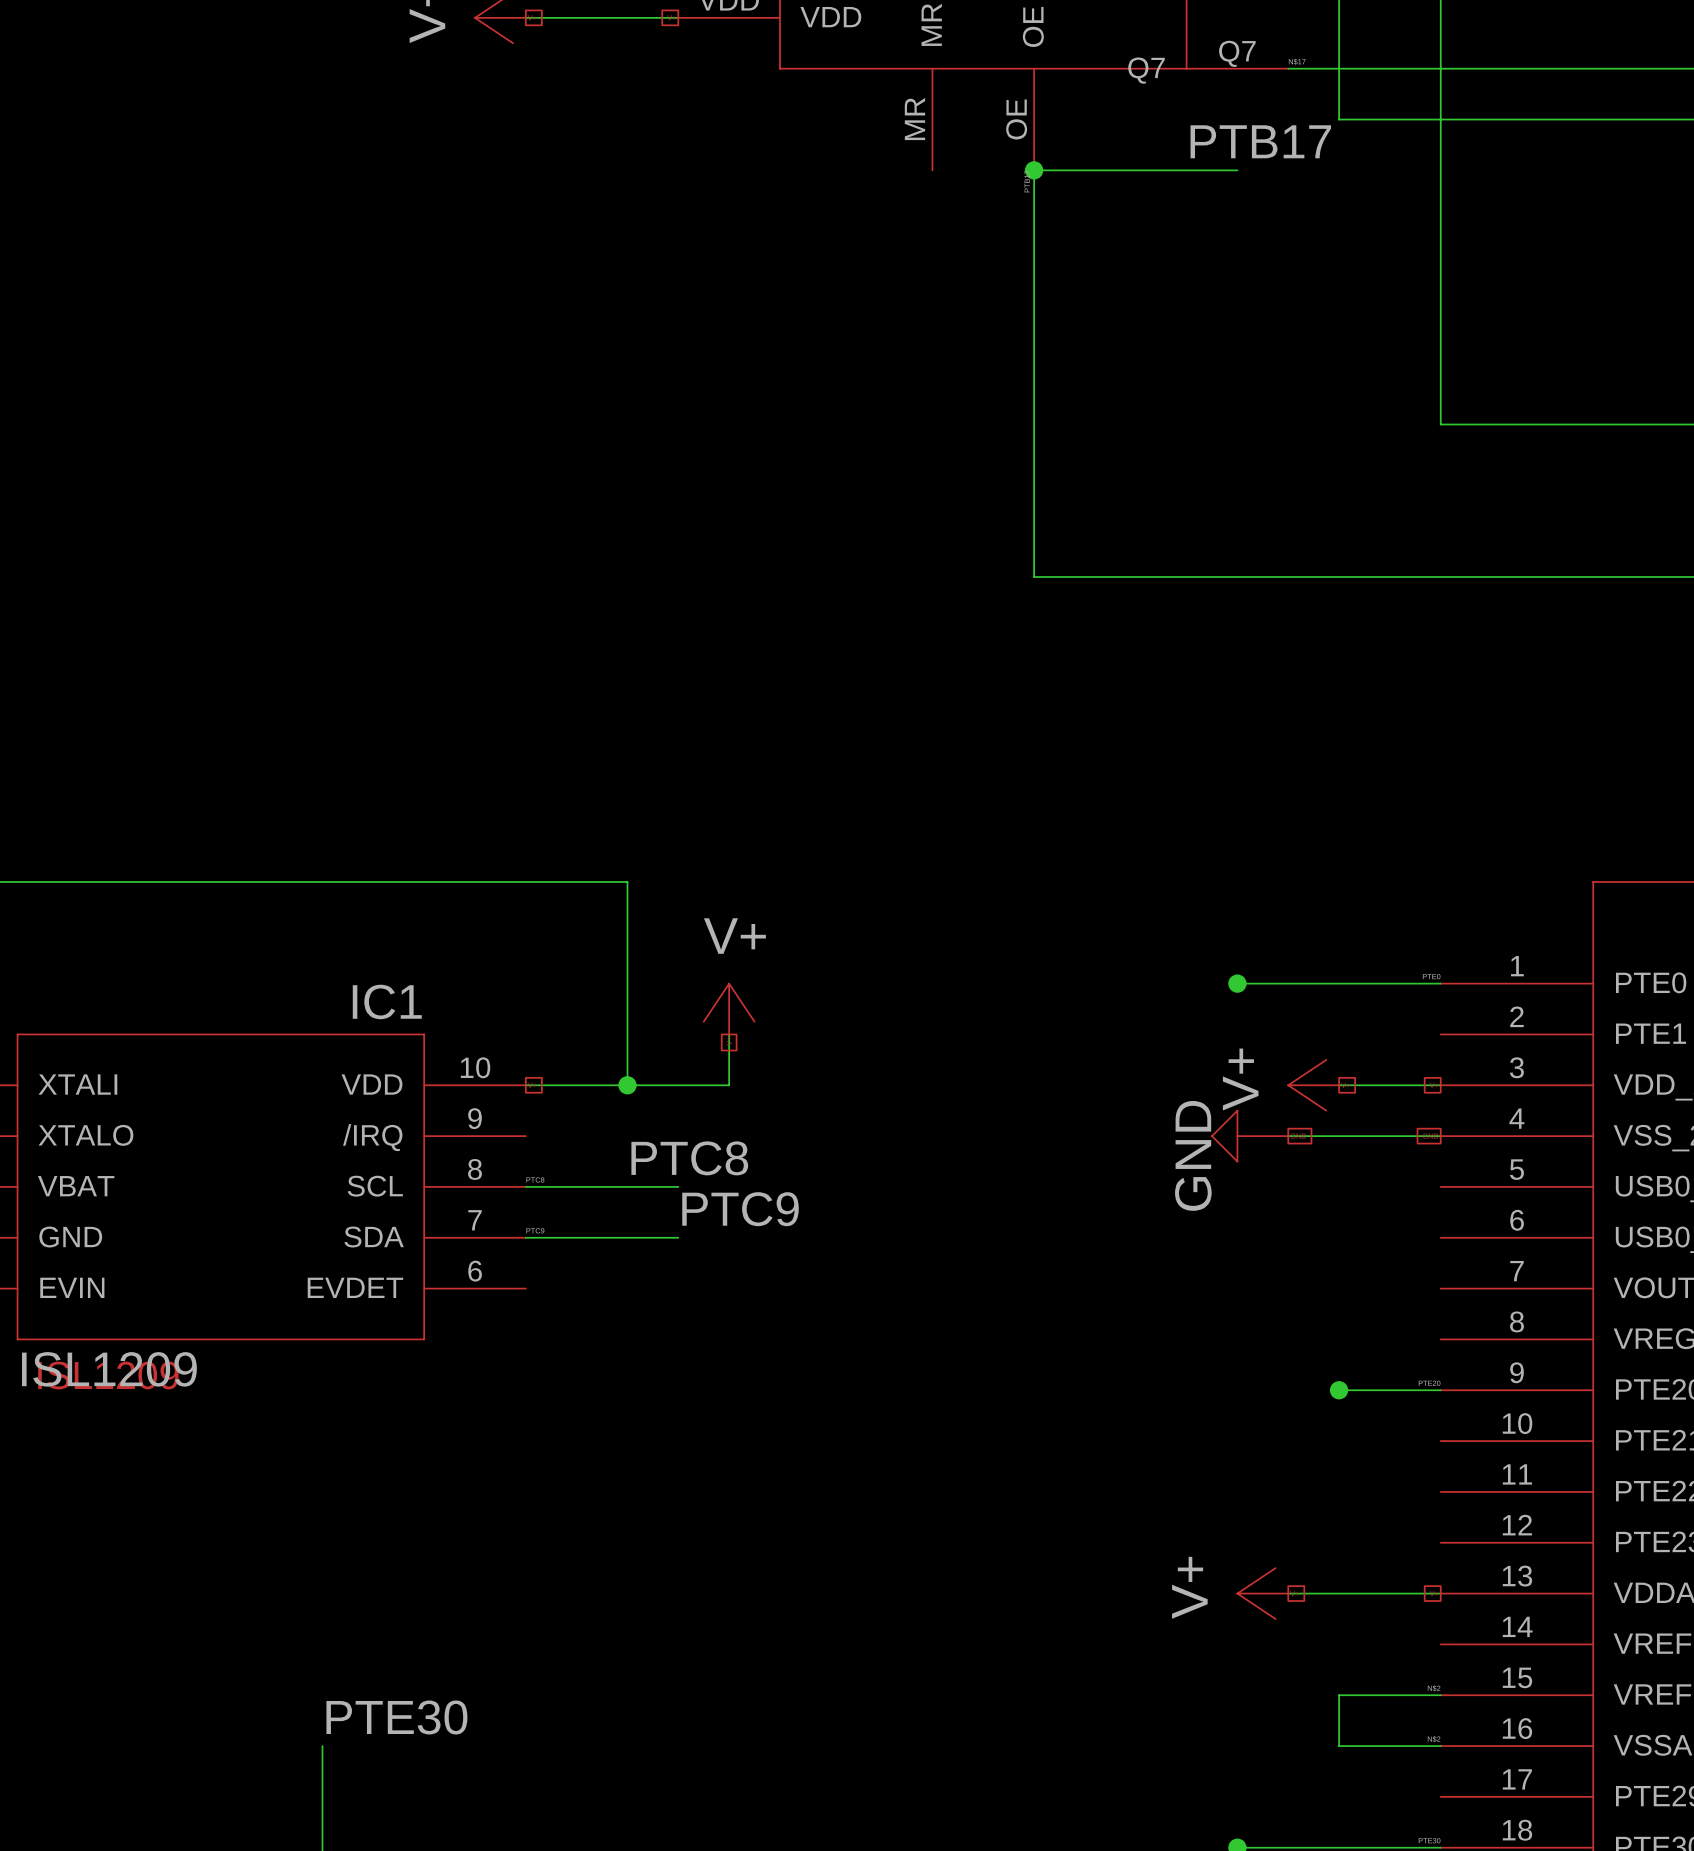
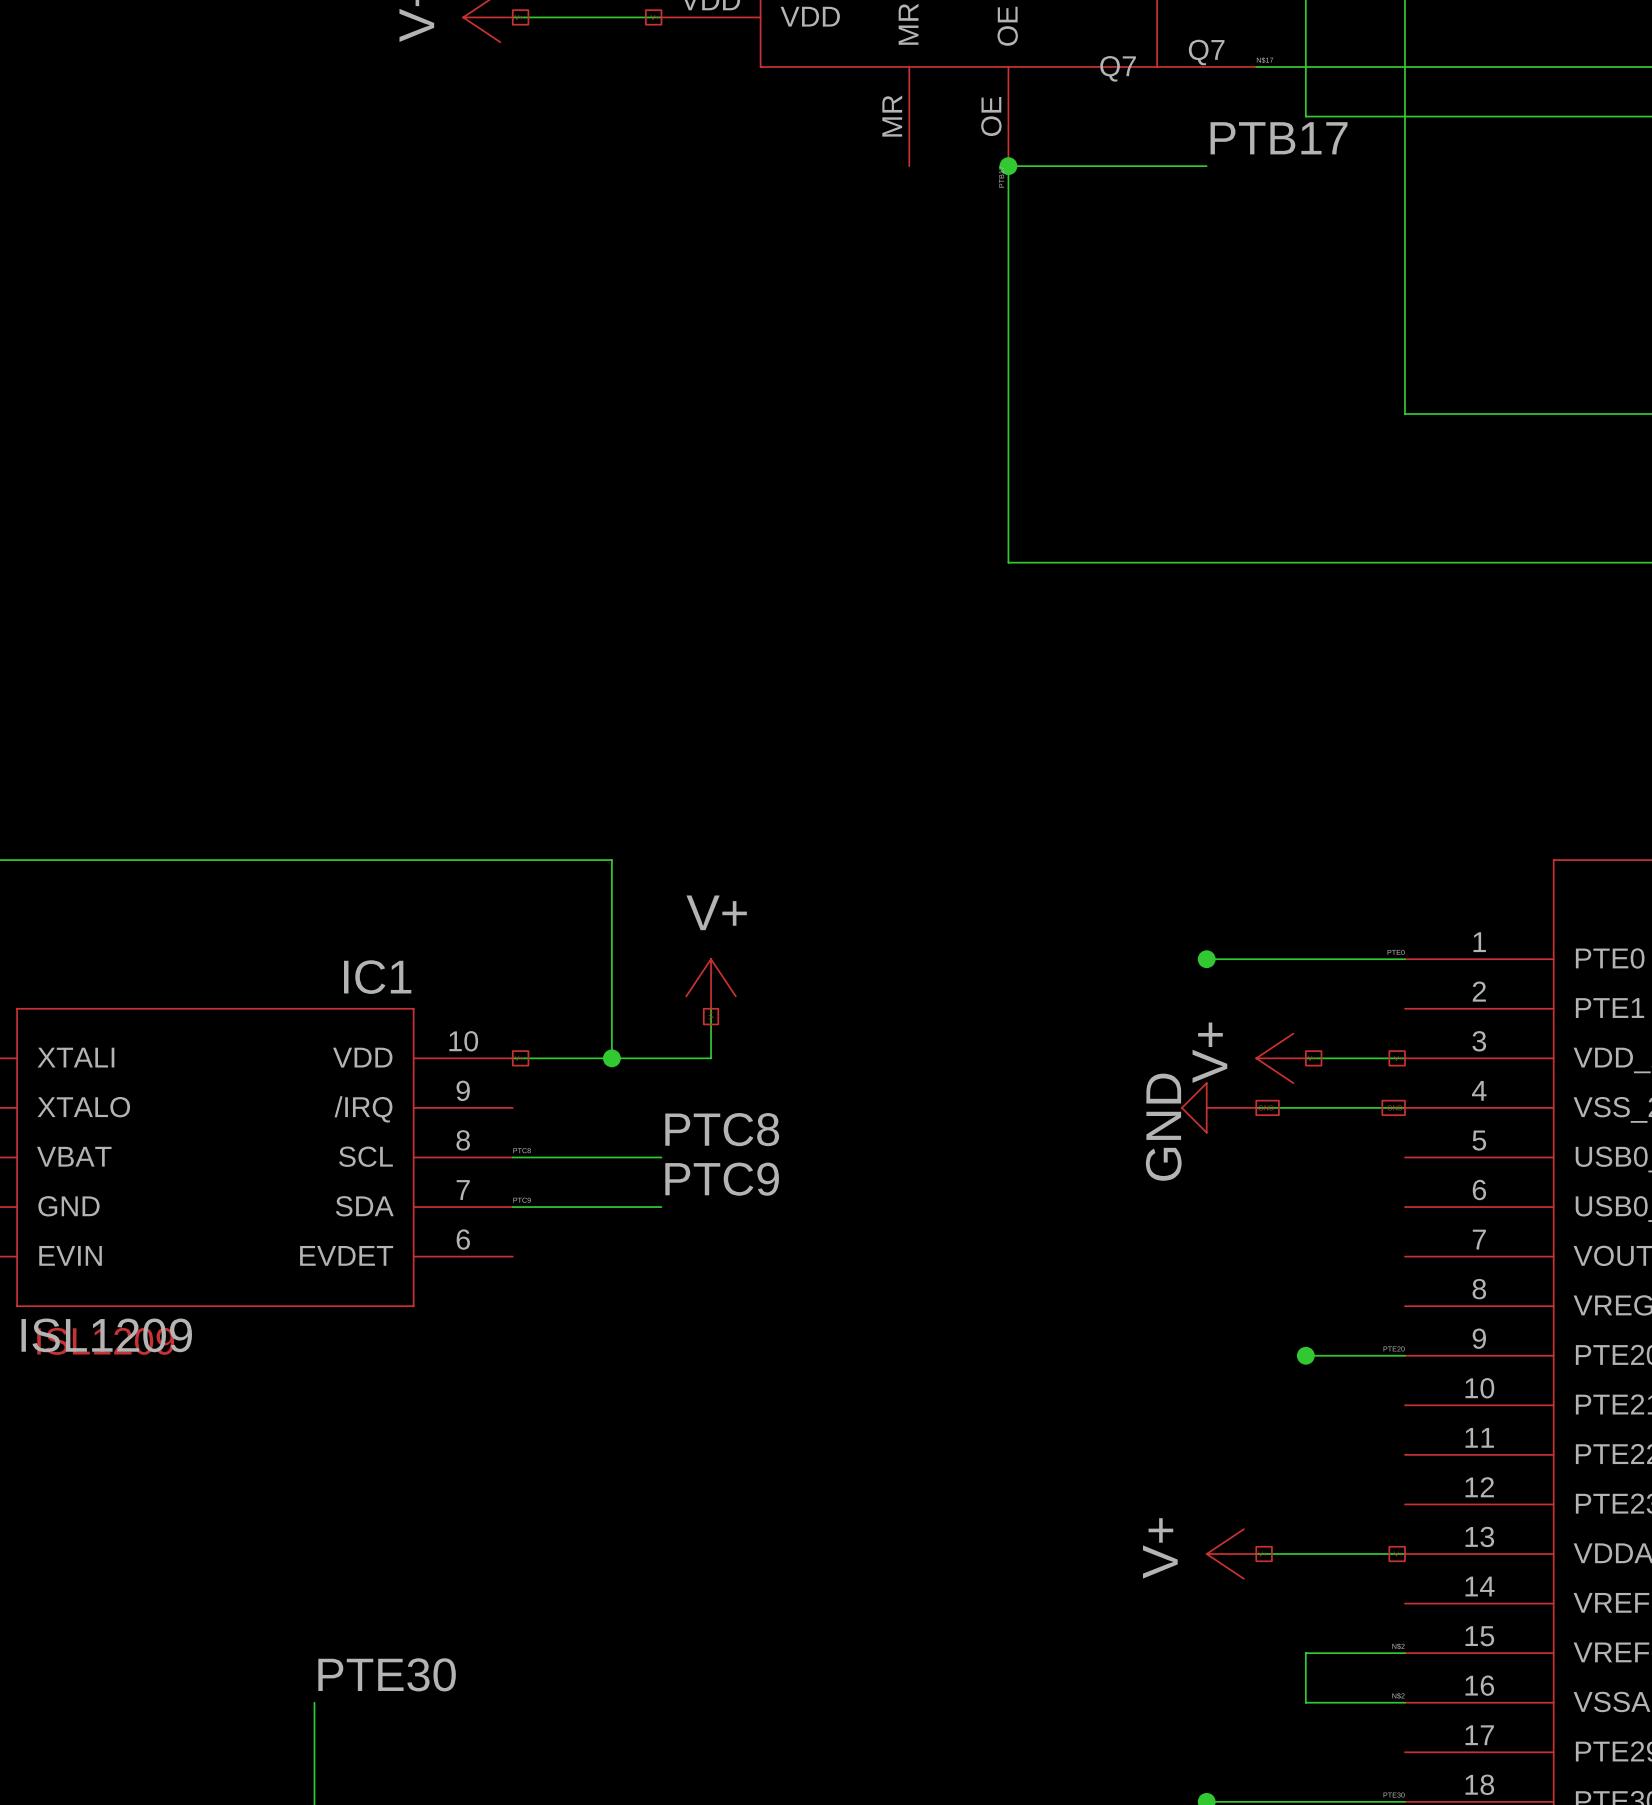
label position: PTB17 (1260, 141) -> PTB17 (1279, 138)
label position: PTC8 (689, 1158) -> PTC8 (722, 1129)

